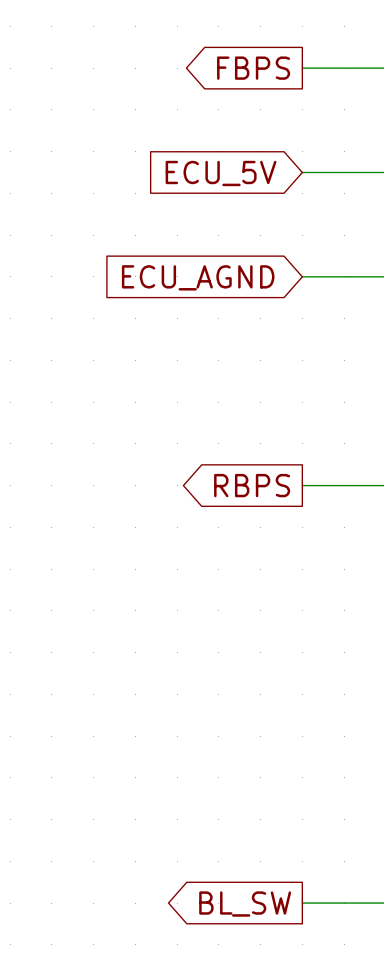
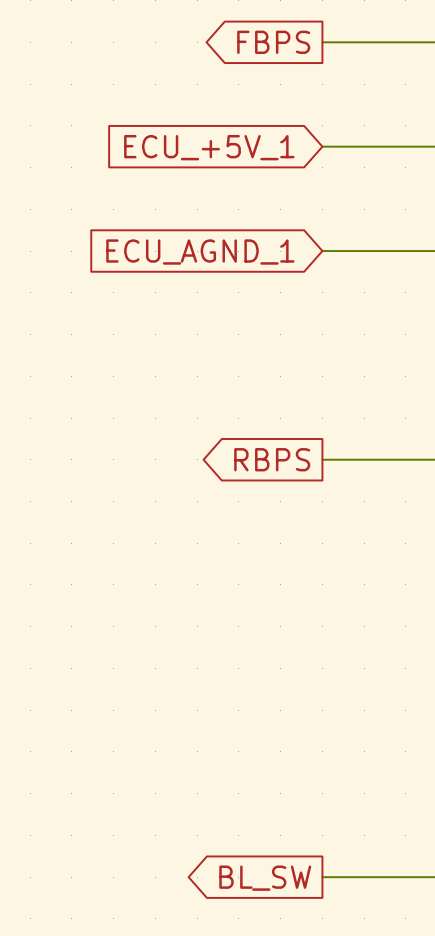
global label: ECU_5V (221, 173) -> ECU_+5V_1 (209, 147)
global label: ECU_AGND (198, 277) -> ECU_AGND_1 (200, 252)

